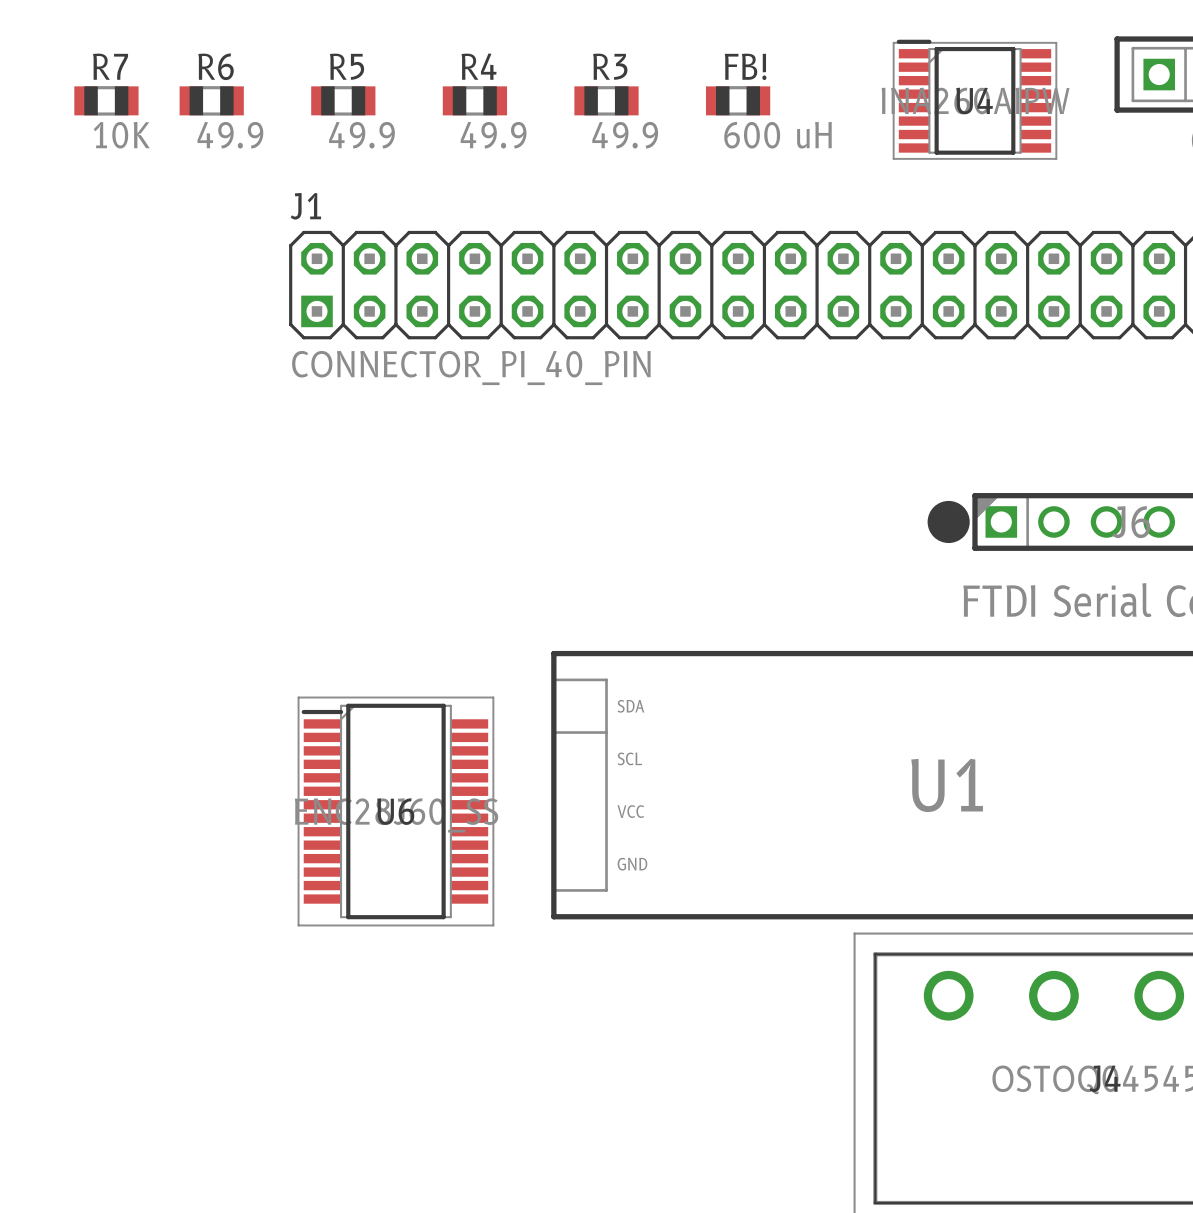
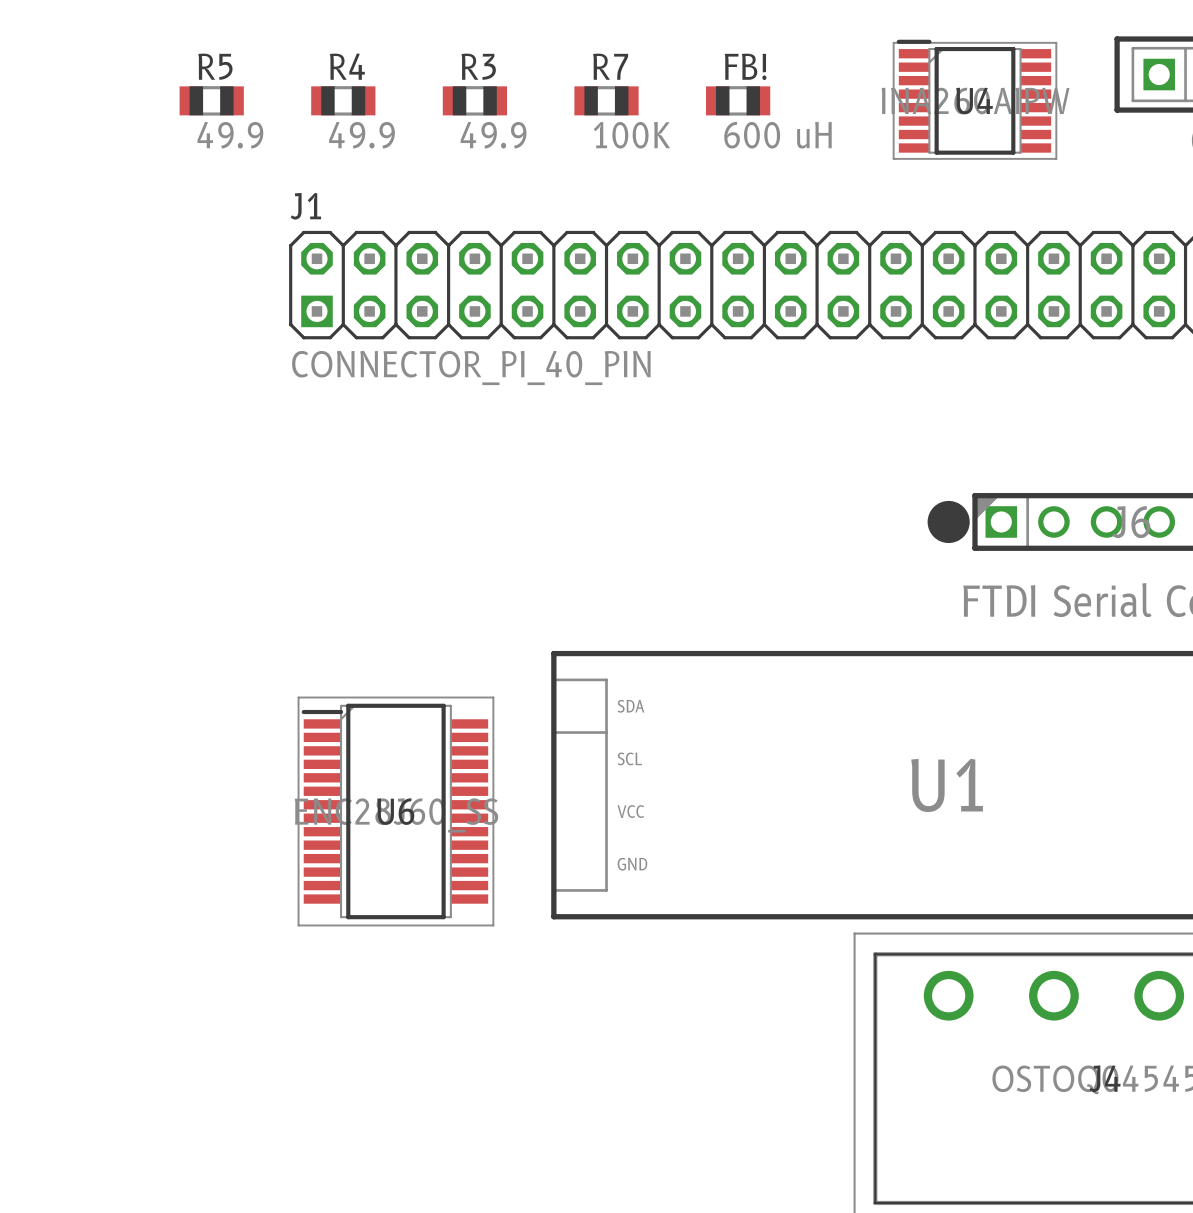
R6 name: R6 (216, 66) -> R5 (215, 66)
R5 name: R5 (347, 66) -> R4 (347, 66)
R4 name: R4 (479, 66) -> R3 (478, 66)
R3 name: R3 (610, 66) -> R7 (610, 66)
R7: 10K (106, 100) -> none
R3 value: 49.9 (625, 135) -> 100K (631, 135)

